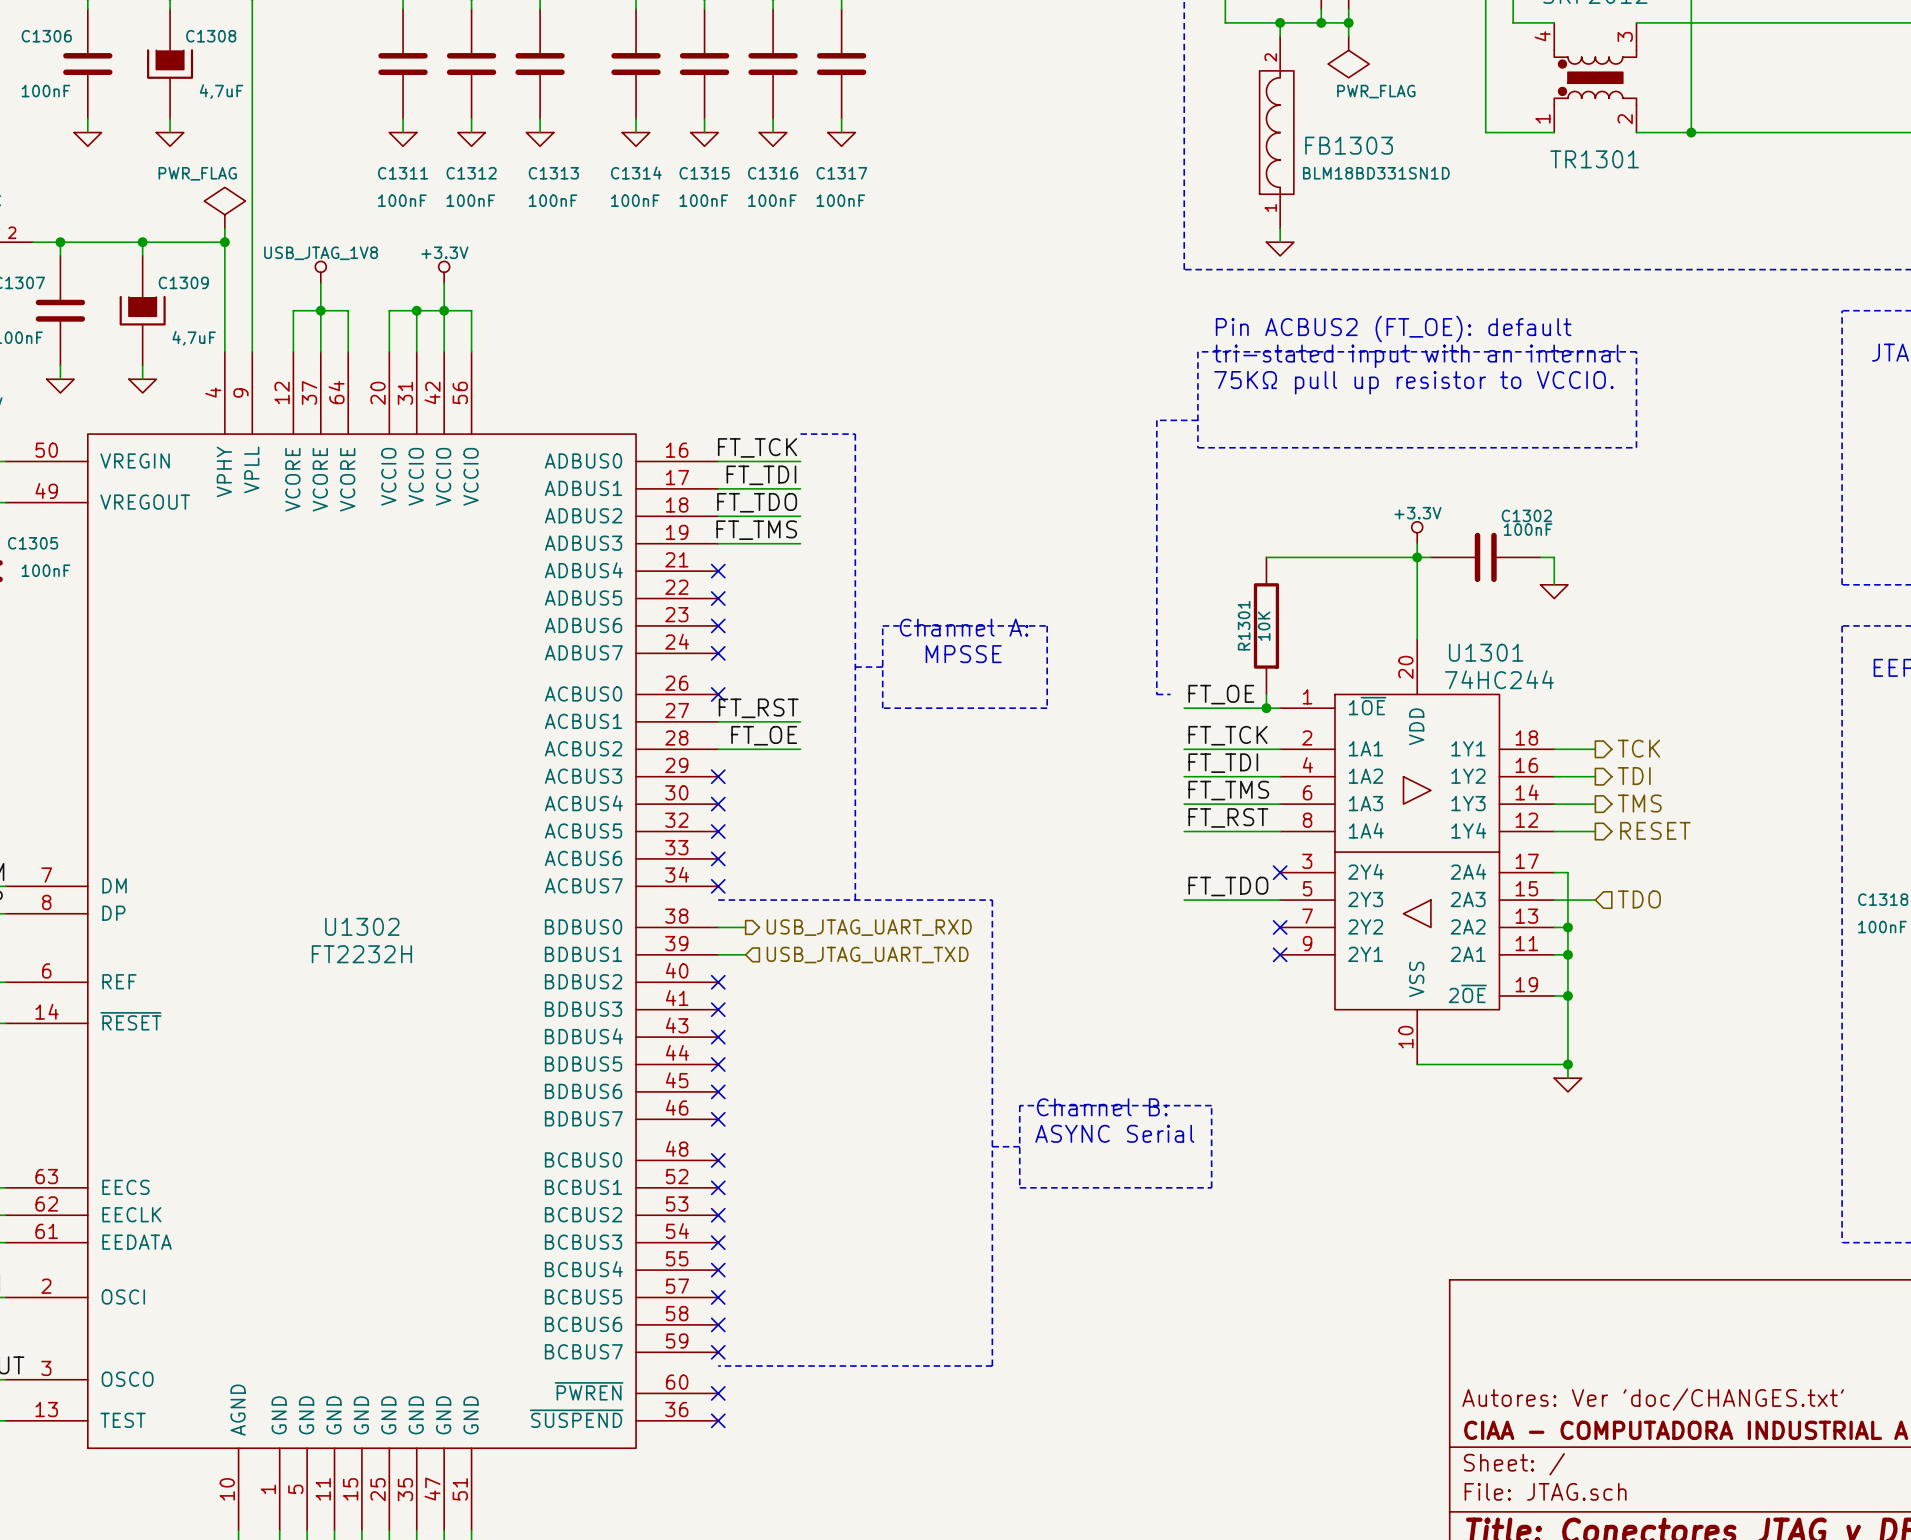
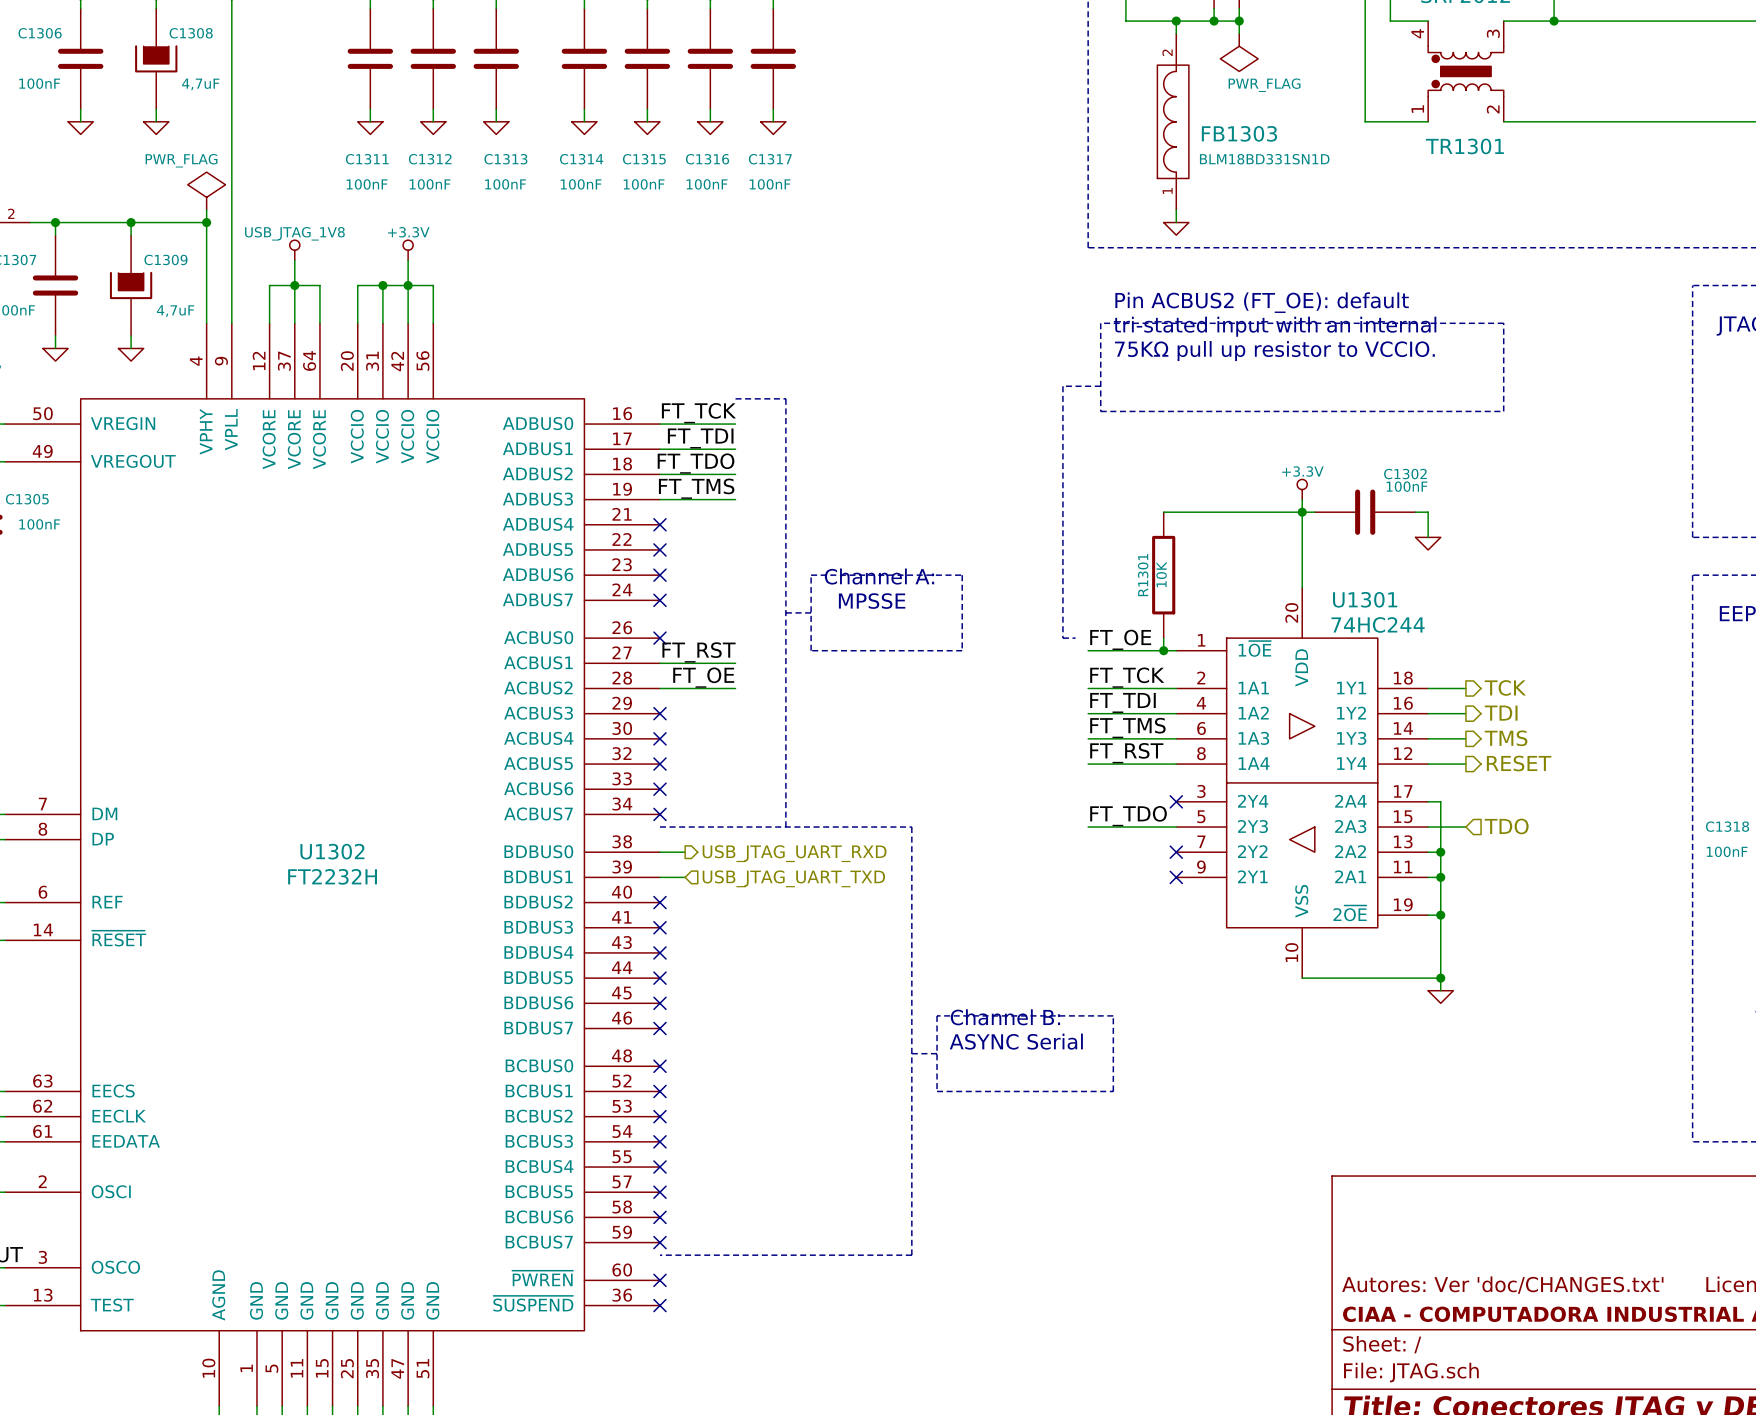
wire: (1691, 22) (1691, 132) -> none
junction: none -> (1554, 21)
junction: (1691, 132) -> none

